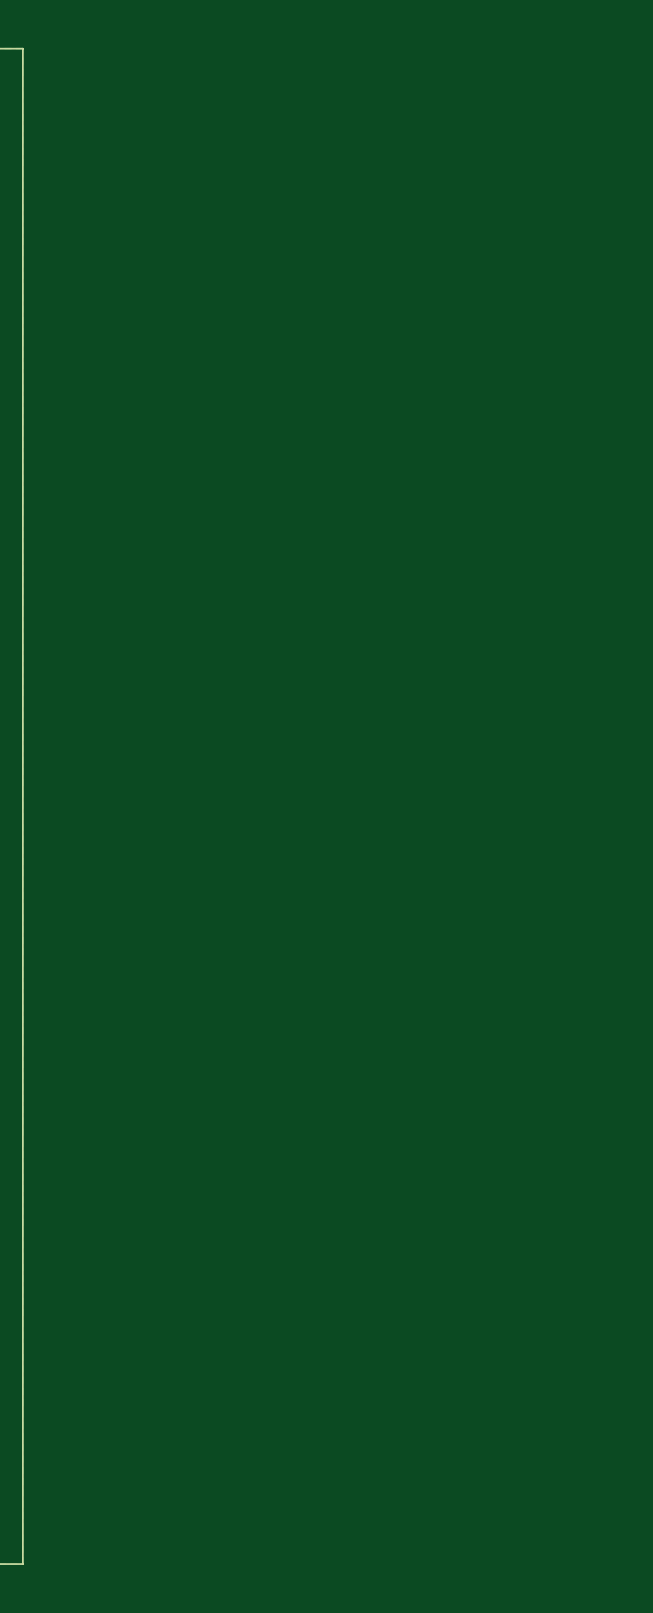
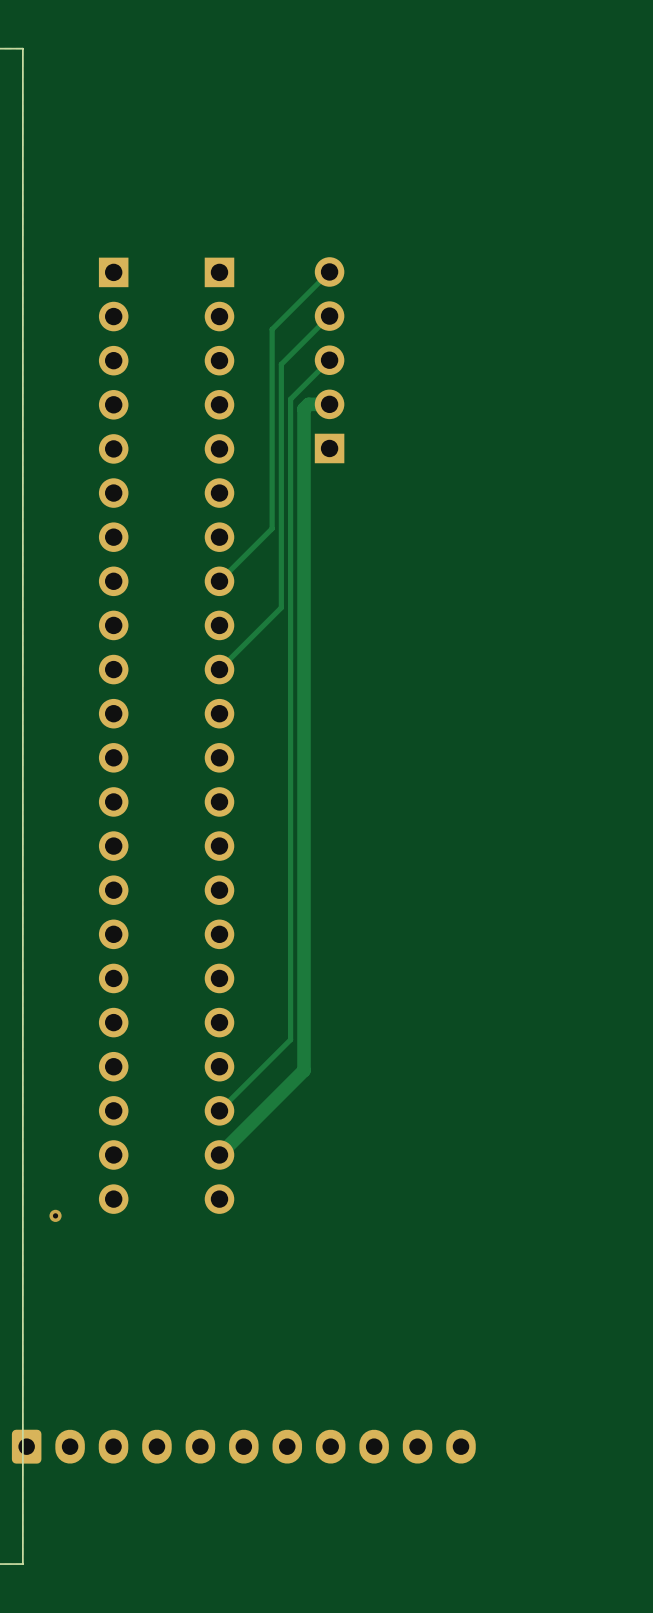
track: none -> (329, 271) (272, 329) (272, 528) (219, 581)
track: none -> (329, 316) (281, 364) (281, 607) (219, 669)
track: none -> (329, 360) (290, 399) (290, 1039) (219, 1110)
part: none -> (329, 360)
track: none -> (329, 404) (308, 404) (304, 409) (304, 1070) (219, 1154)
part: none -> (113, 735)
part: none -> (219, 735)
via: none -> (55, 1215)
part: none -> (243, 1446)

